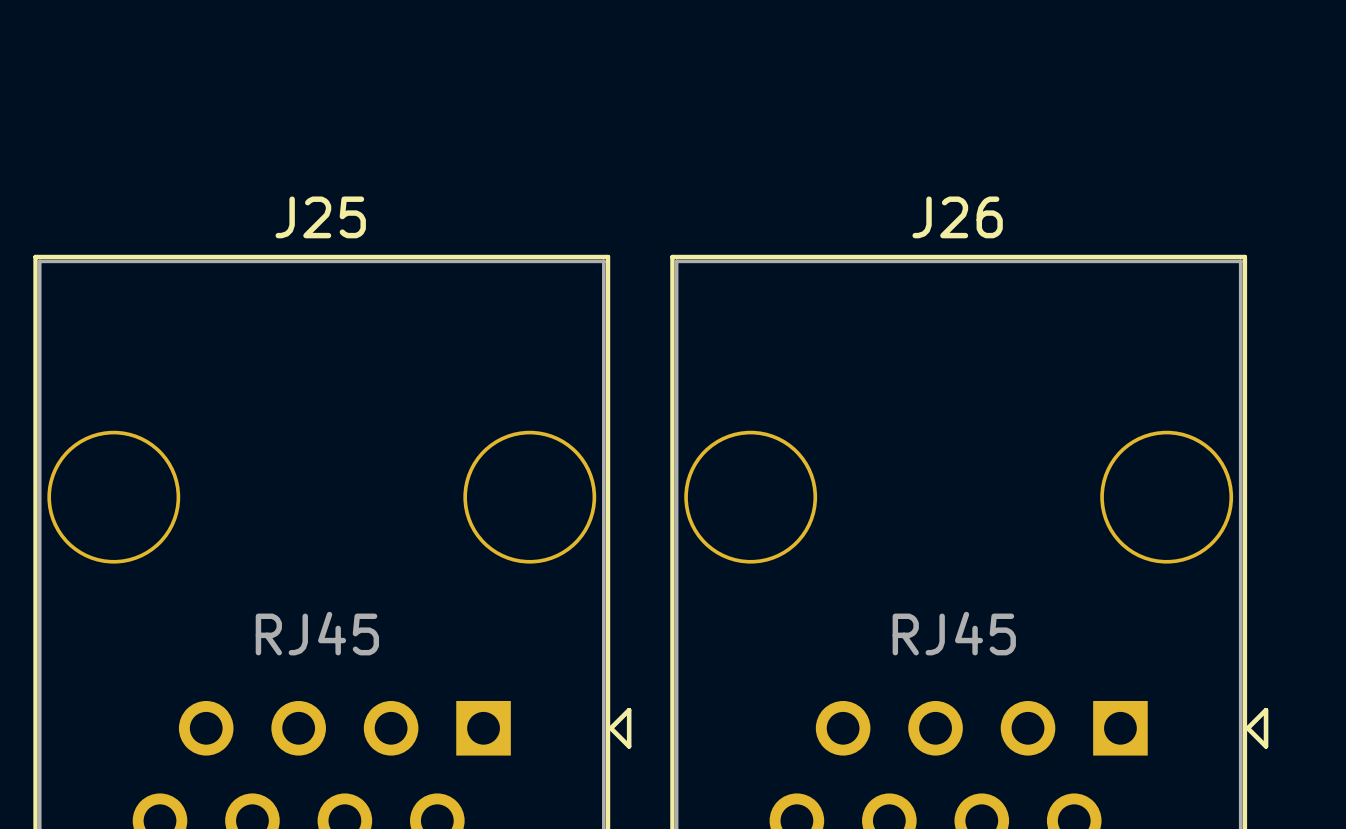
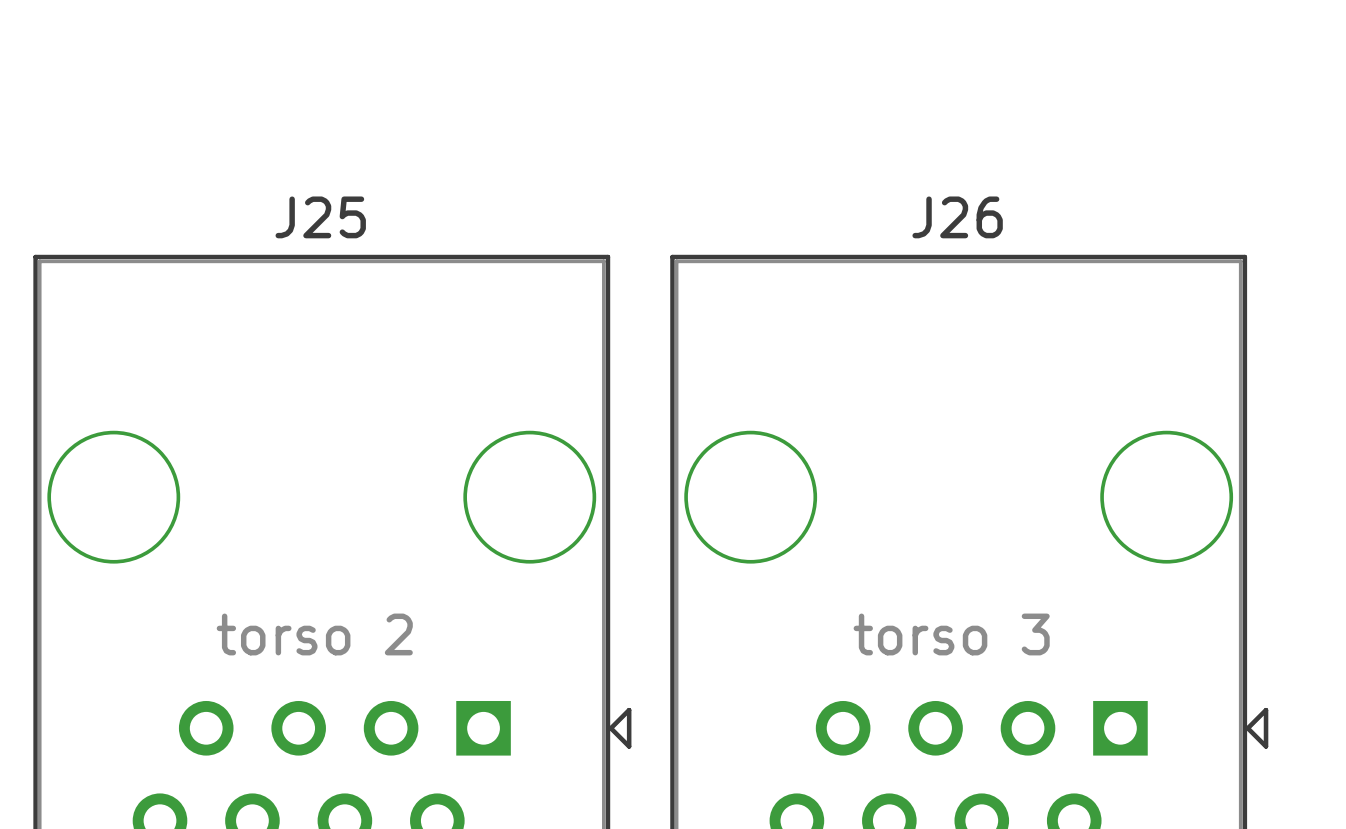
J25 value: RJ45 (317, 633) -> torso 2 (314, 634)
J26 value: RJ45 (954, 633) -> torso 3 (951, 634)

